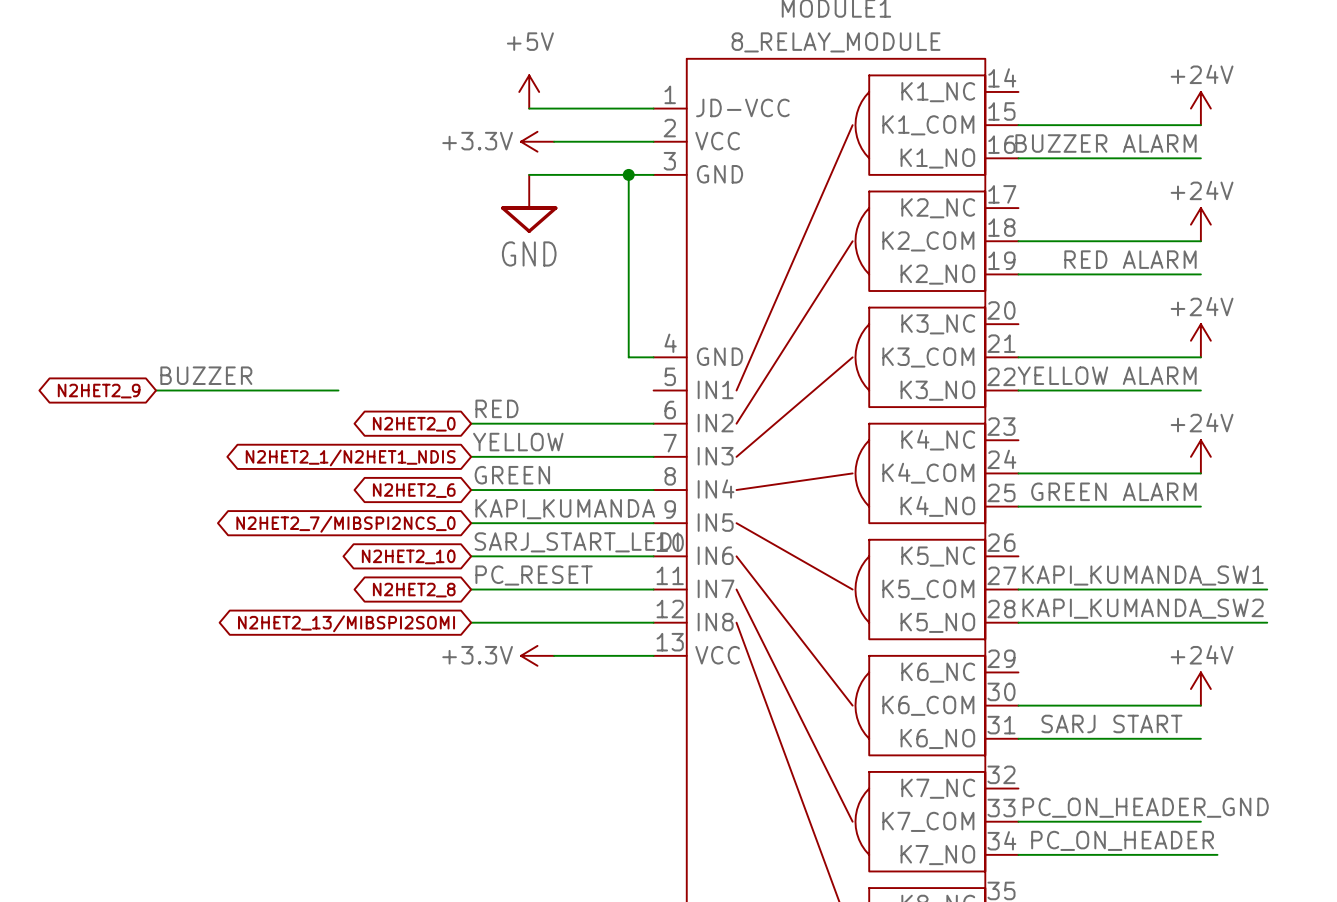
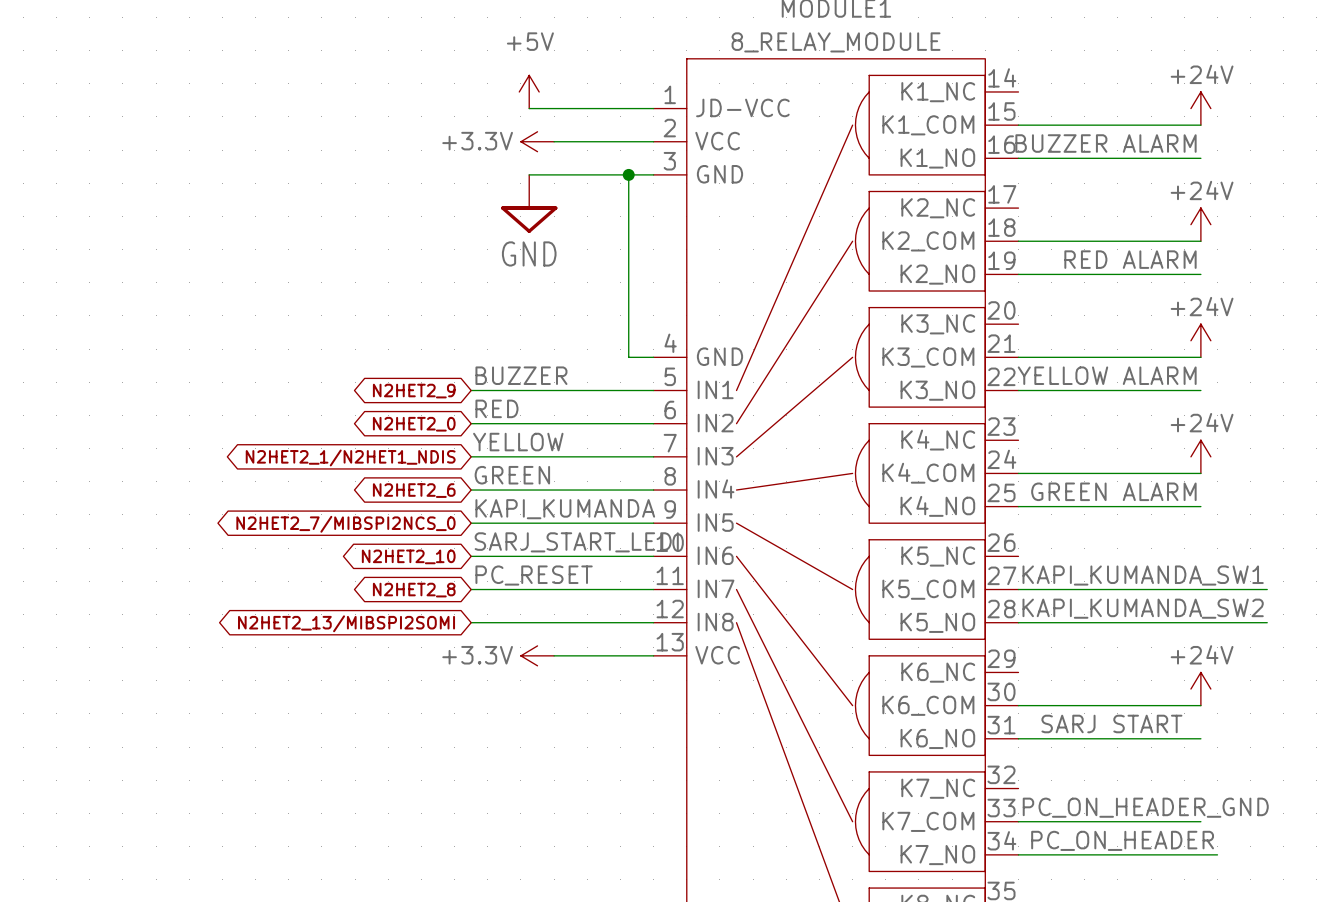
label position: BUZZER (206, 375) -> BUZZER (521, 375)
wire: (156, 390) (338, 390) -> (471, 390) (653, 390)
global label position: N2HET2_9 (99, 391) -> N2HET2_9 (414, 391)

